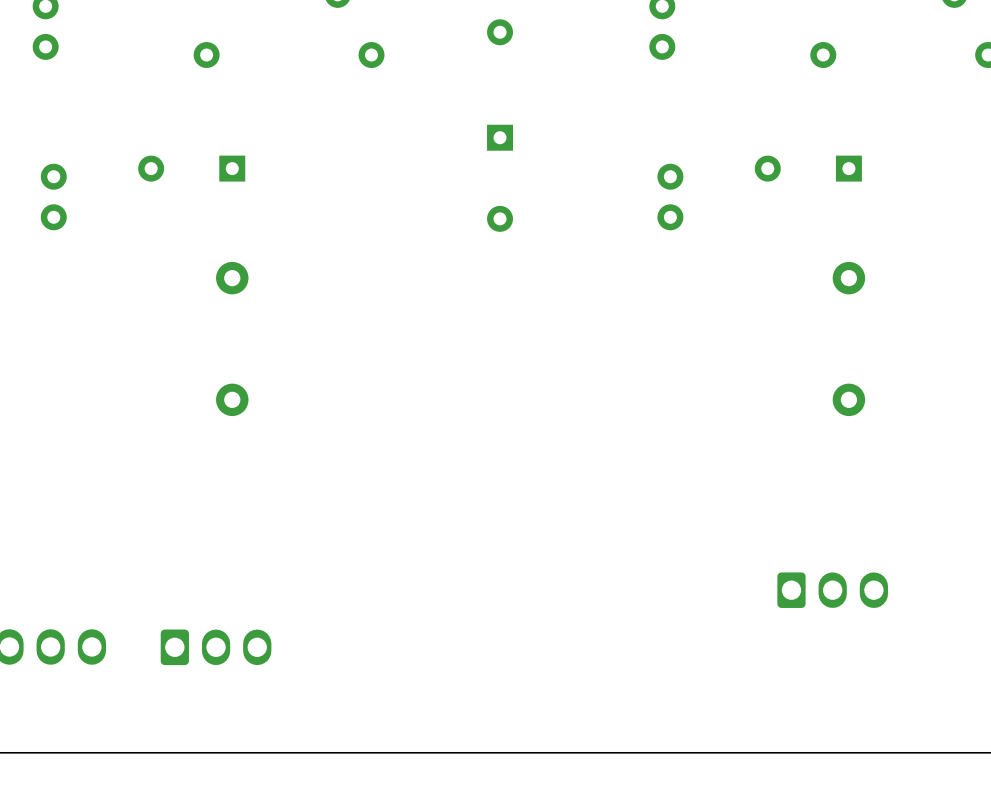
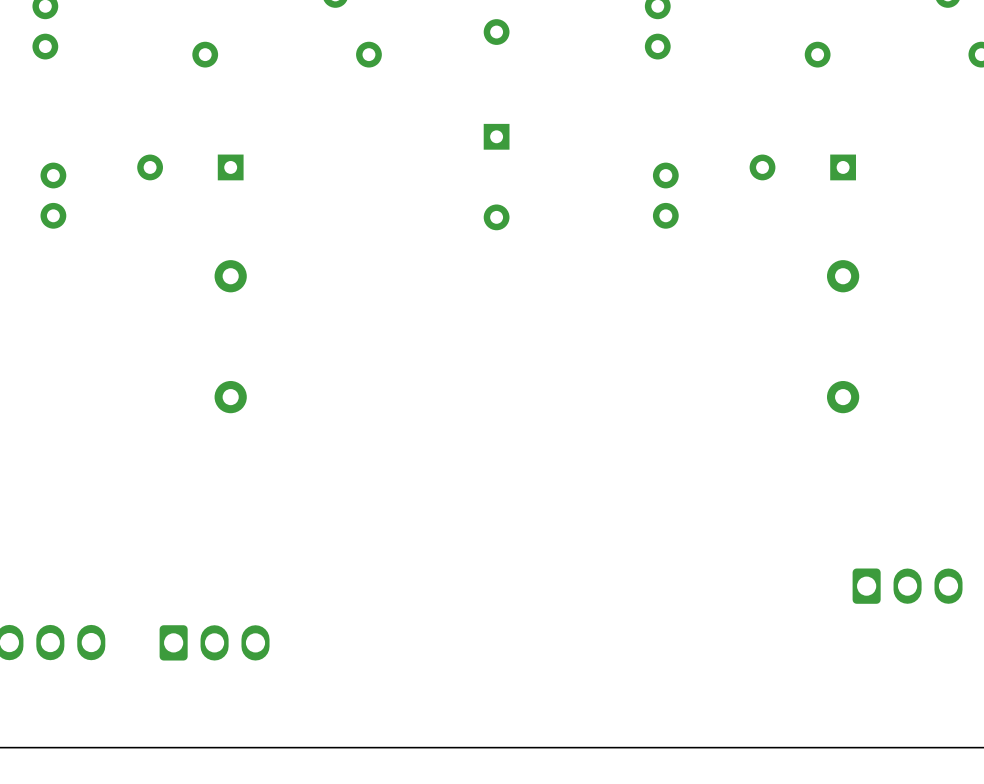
part position: (832, 590) -> (907, 586)

